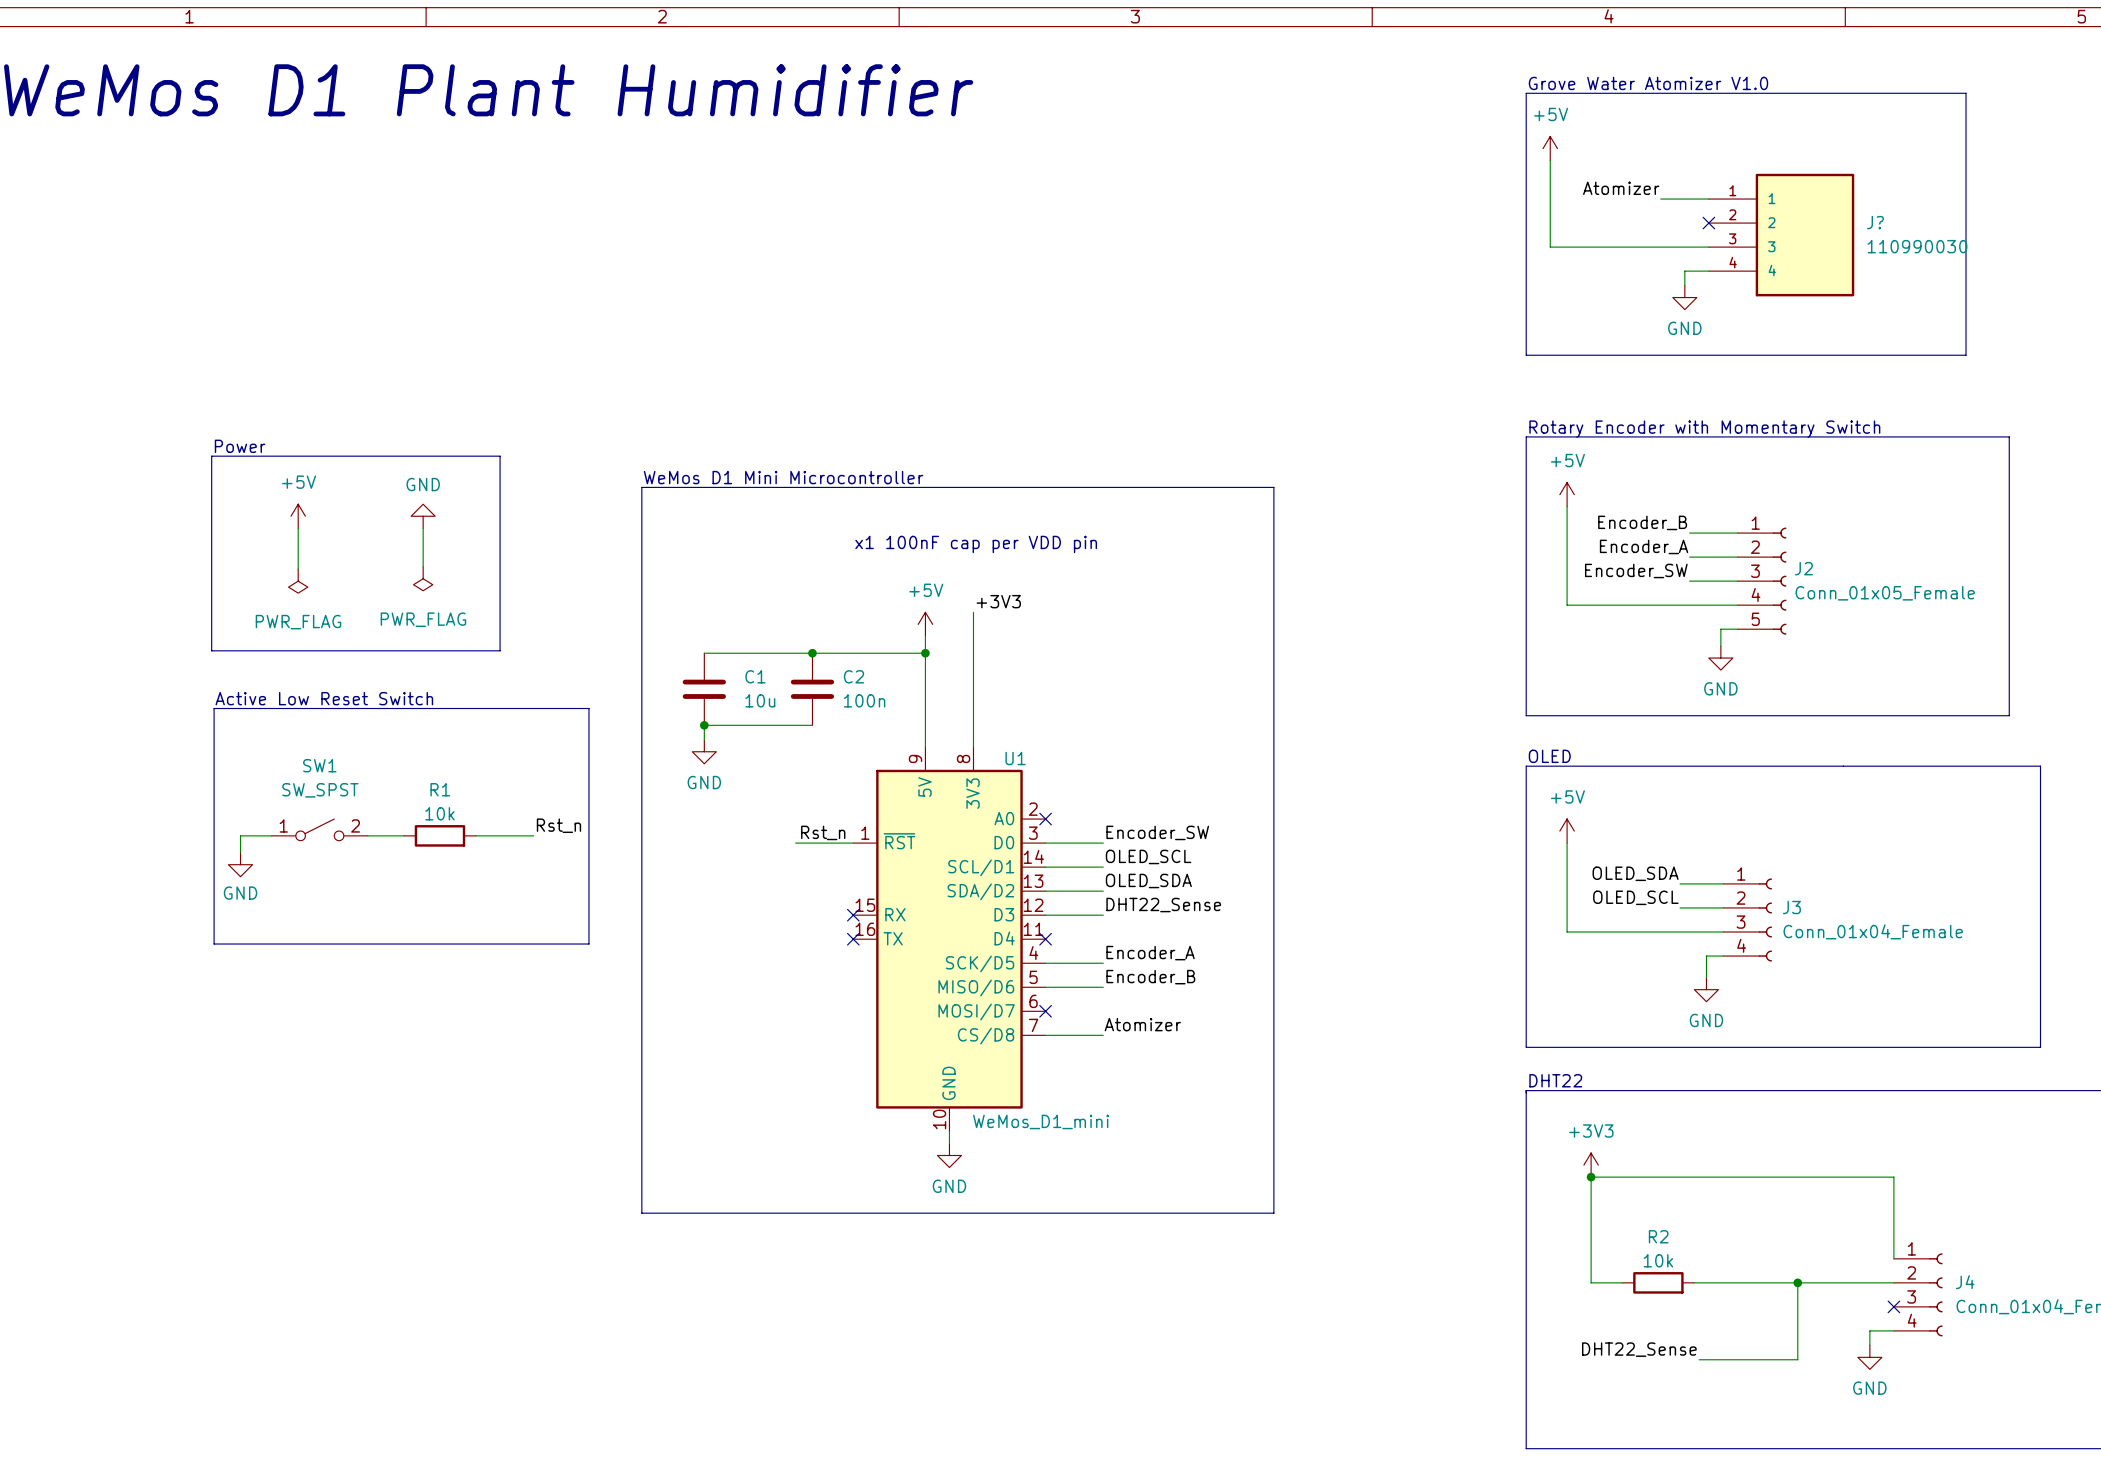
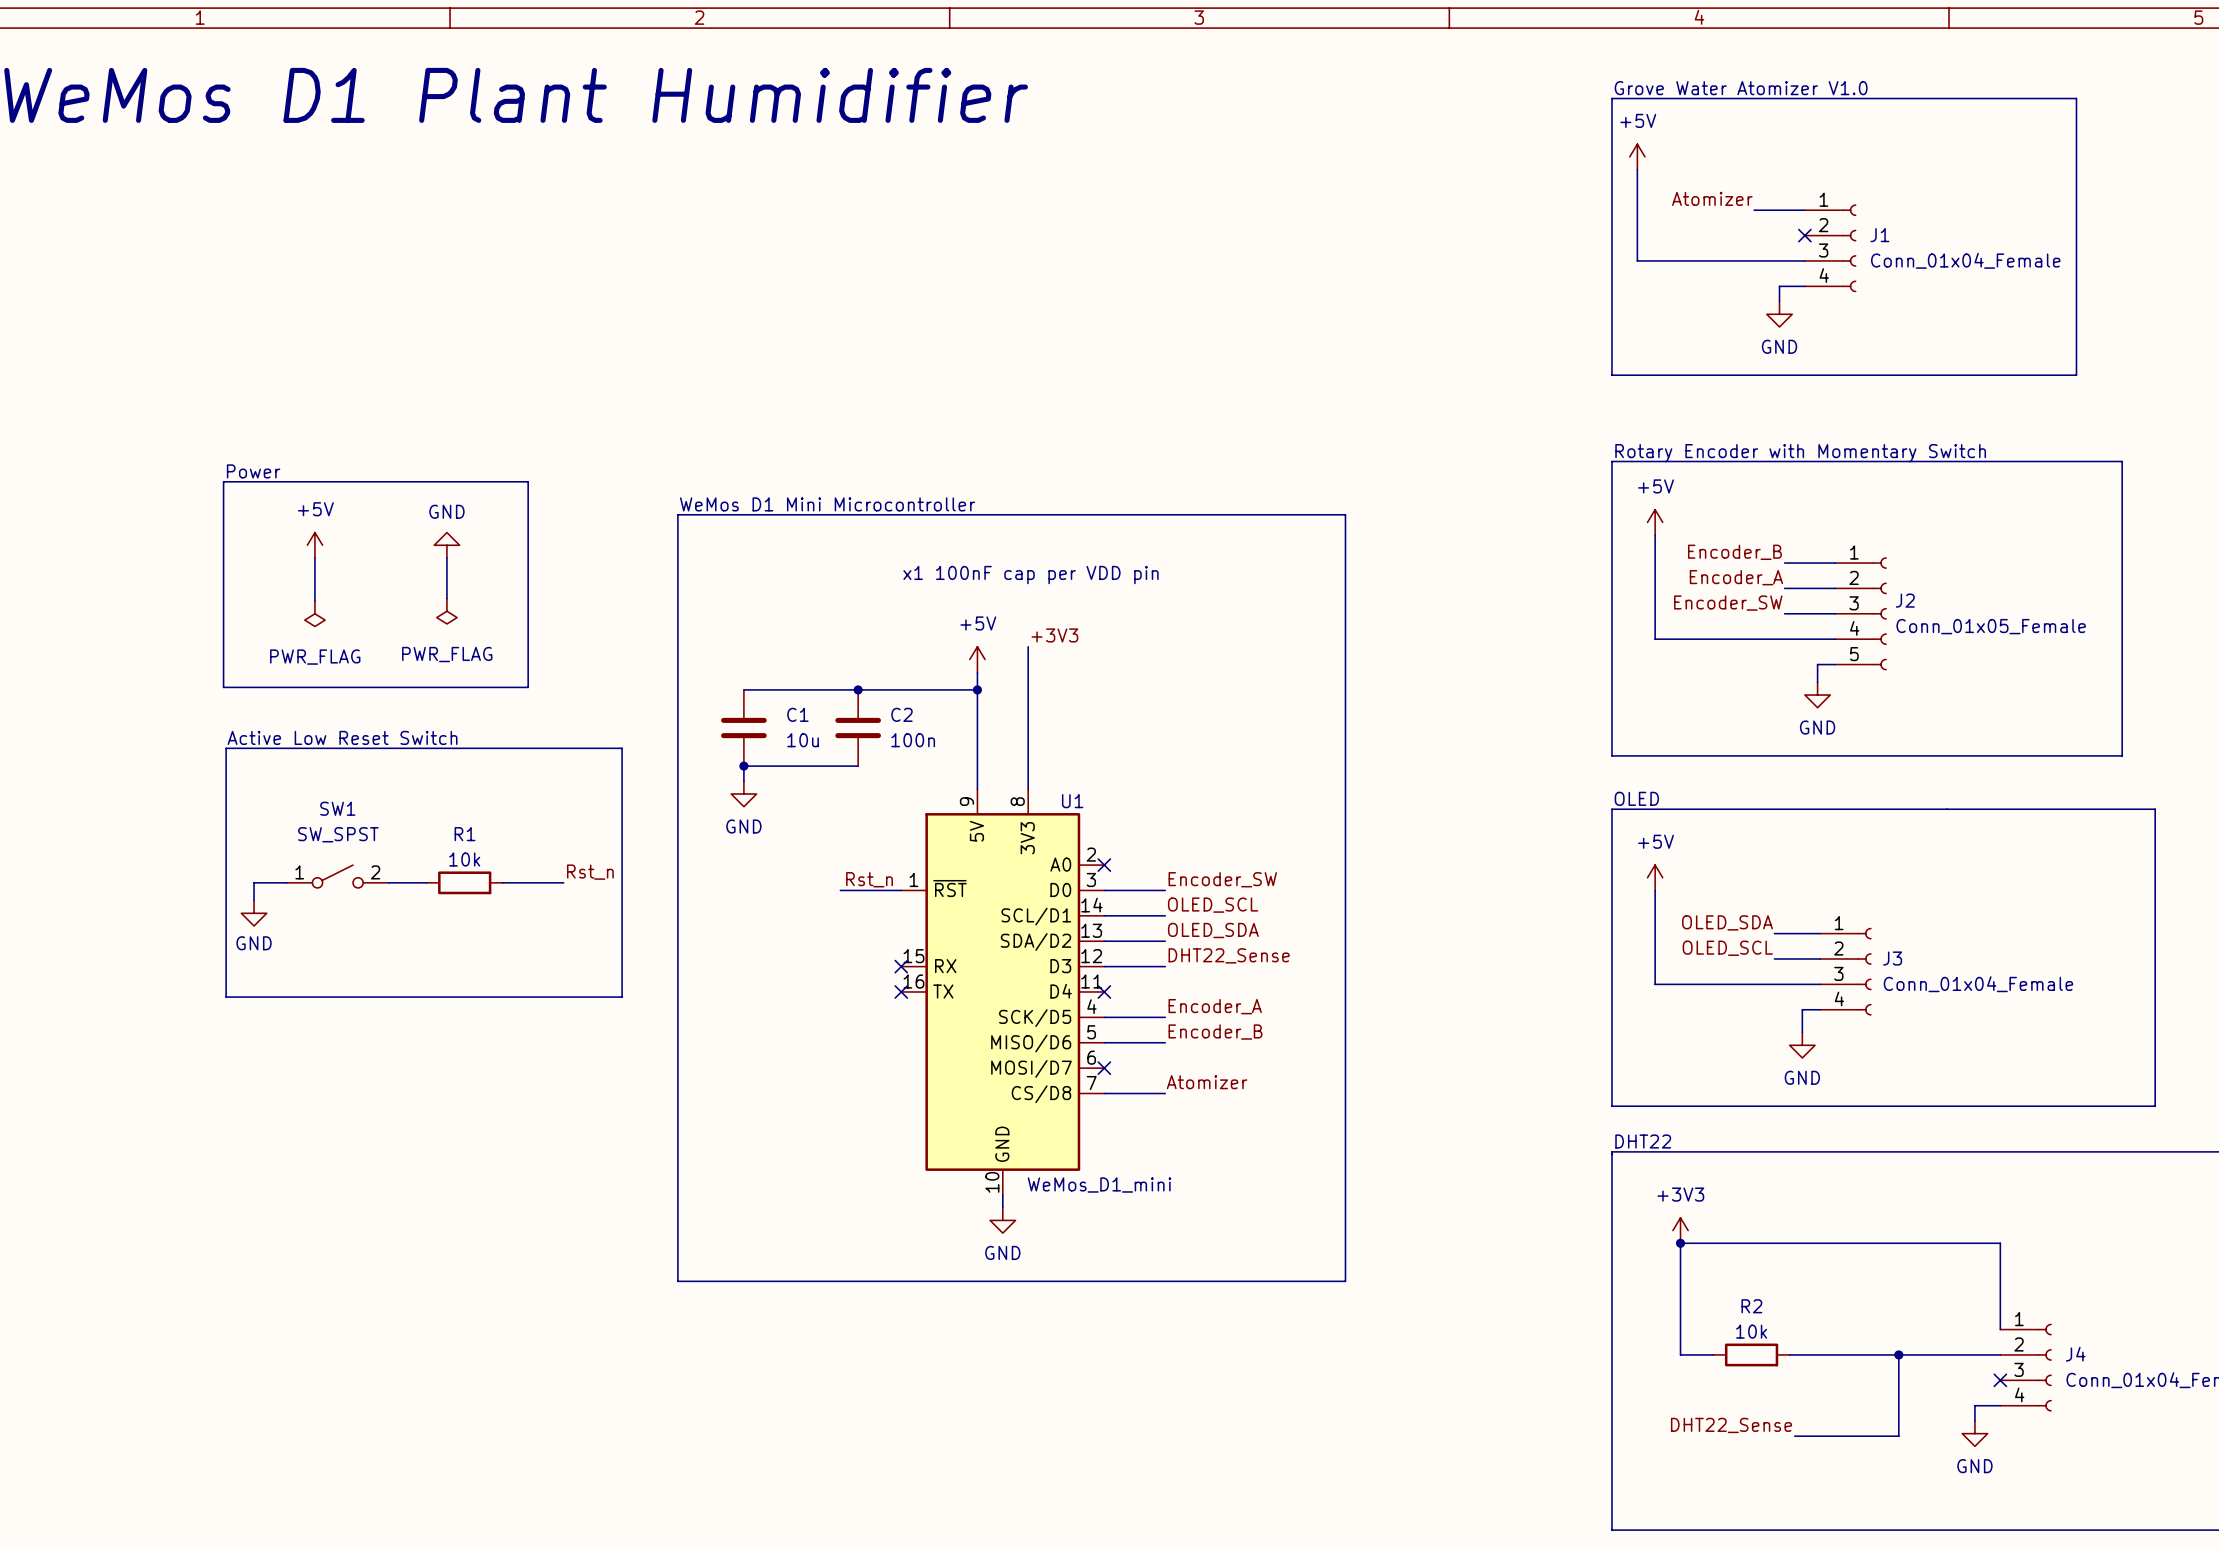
J1: none -> Conn_01x04_Female (1830, 248)
J?: 110990030 (1781, 235) -> none

